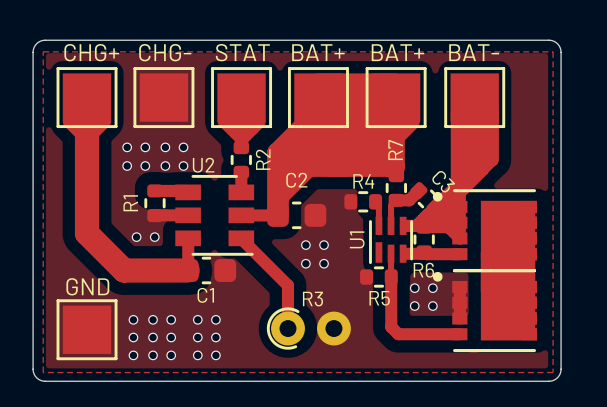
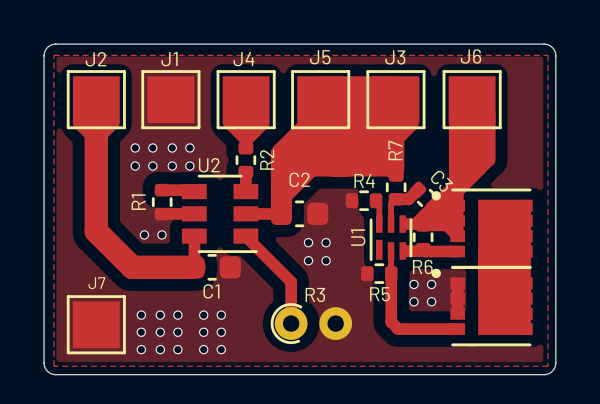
text: CHG+ (91, 52) -> none
text: CHG- (165, 52) -> none
text: STAT (242, 52) -> none
text: BAT+ (318, 52) -> none
text: BAT+ (397, 52) -> none
text: BAT- (474, 52) -> none
J5 name: none -> J5 (320, 57)
J6 name: none -> J6 (470, 56)
J3 name: none -> J3 (395, 57)
J2 name: none -> J2 (96, 59)
J1 name: none -> J1 (169, 59)
J4 name: none -> J4 (243, 59)
J7 name: none -> J7 (96, 283)
text: GND (87, 286) -> none

